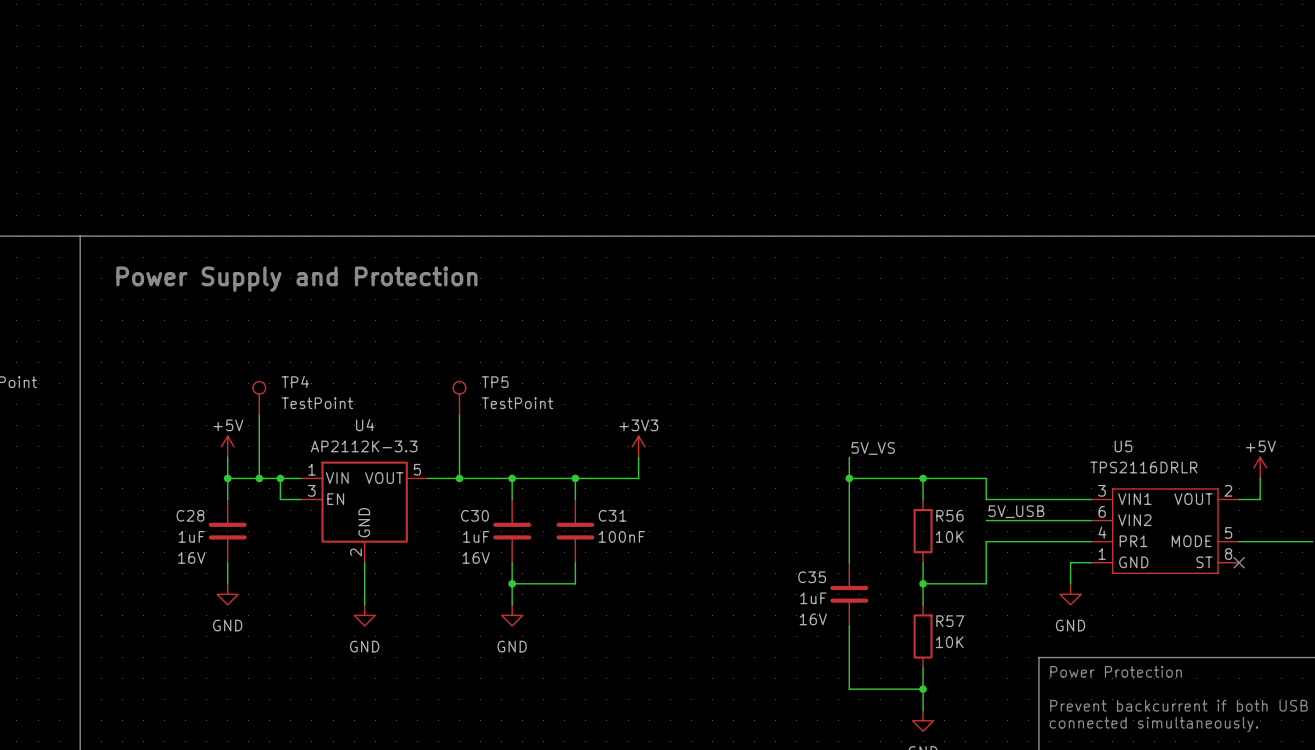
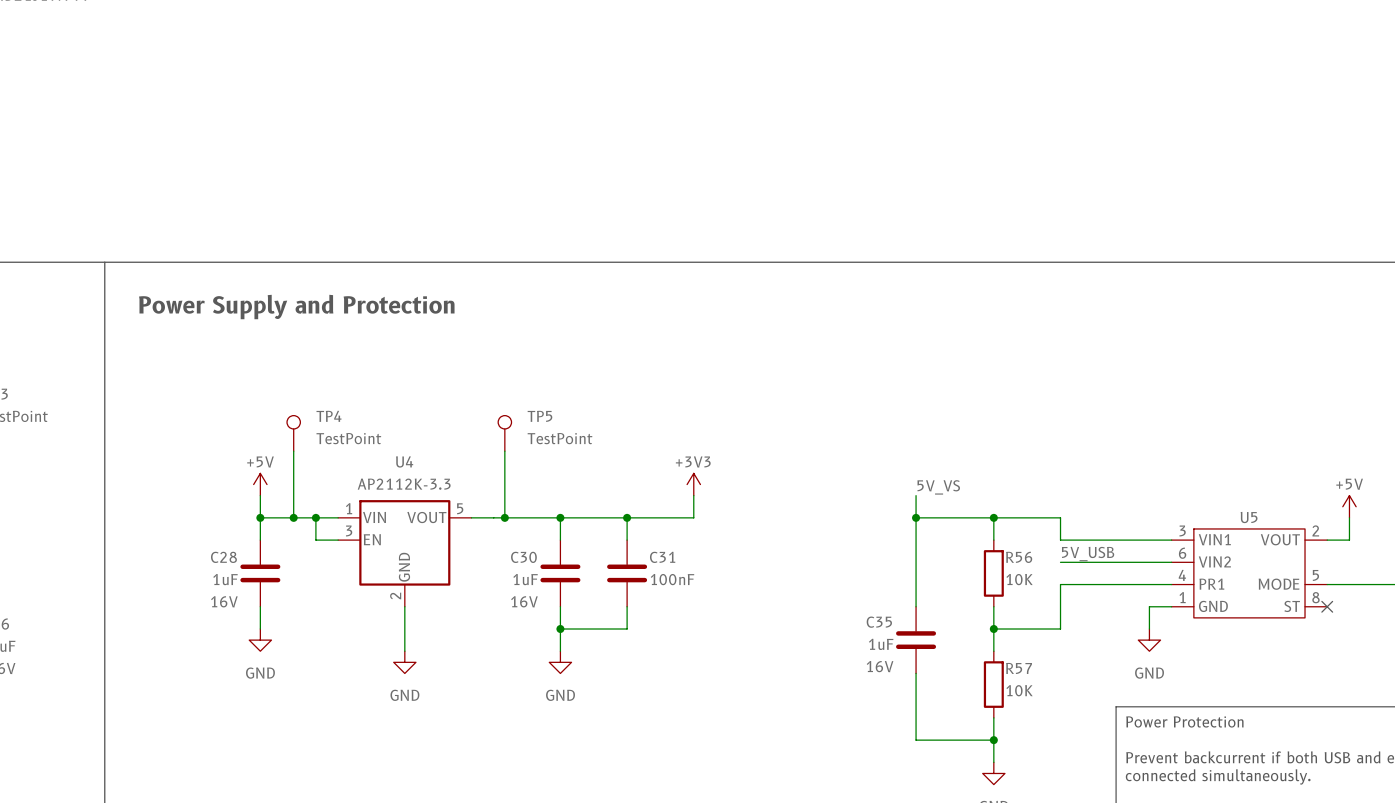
U5 name position: U5 (1123, 446) -> U5 (1249, 517)
U5 value: TPS2116DRLR (1143, 467) -> none

